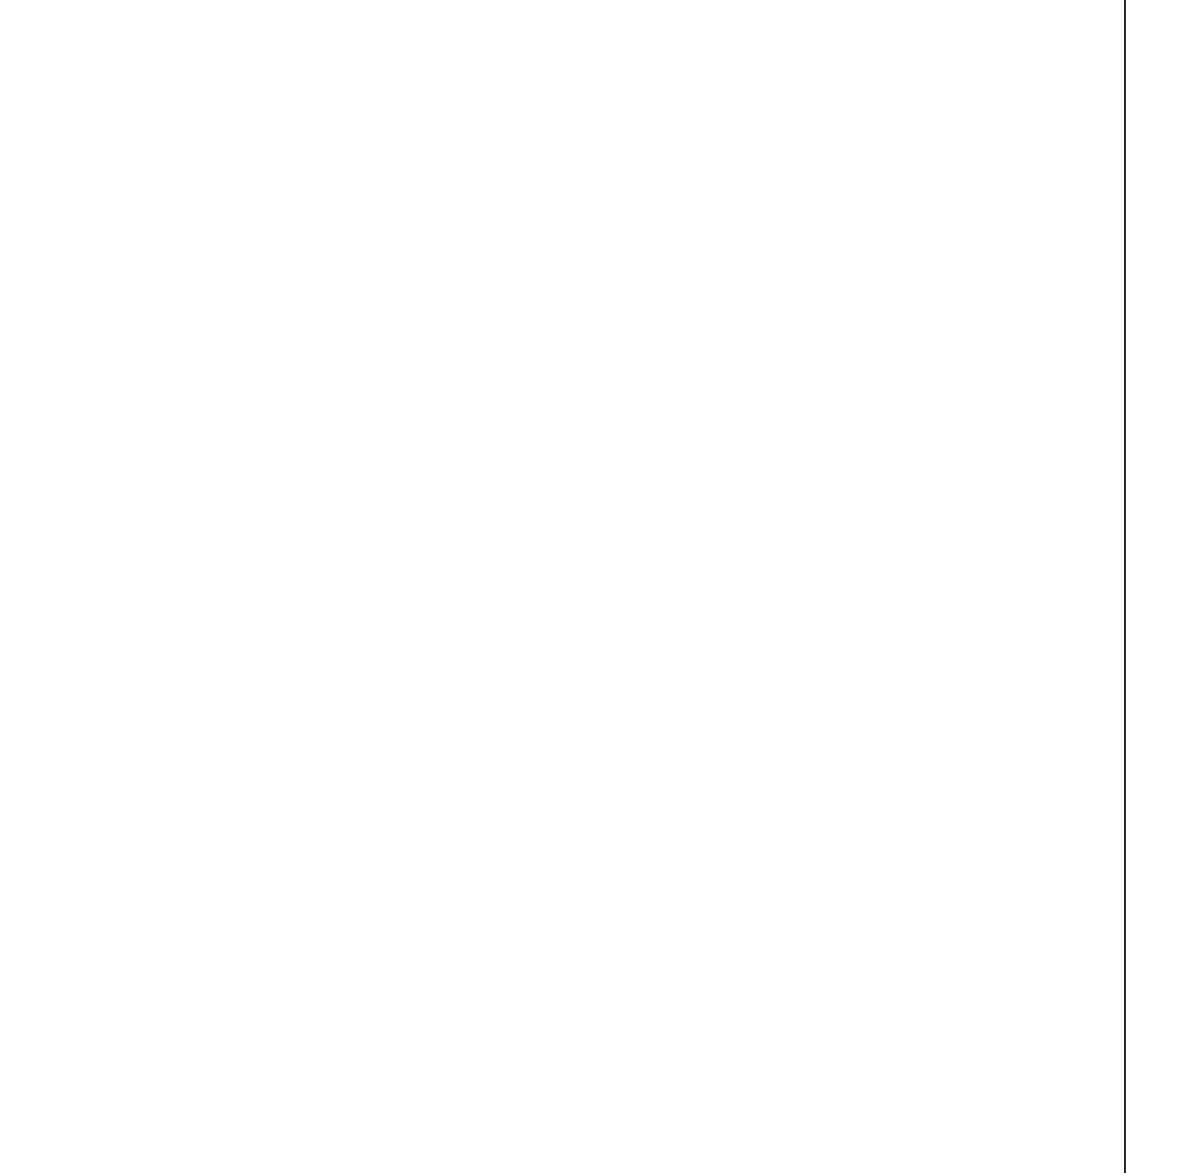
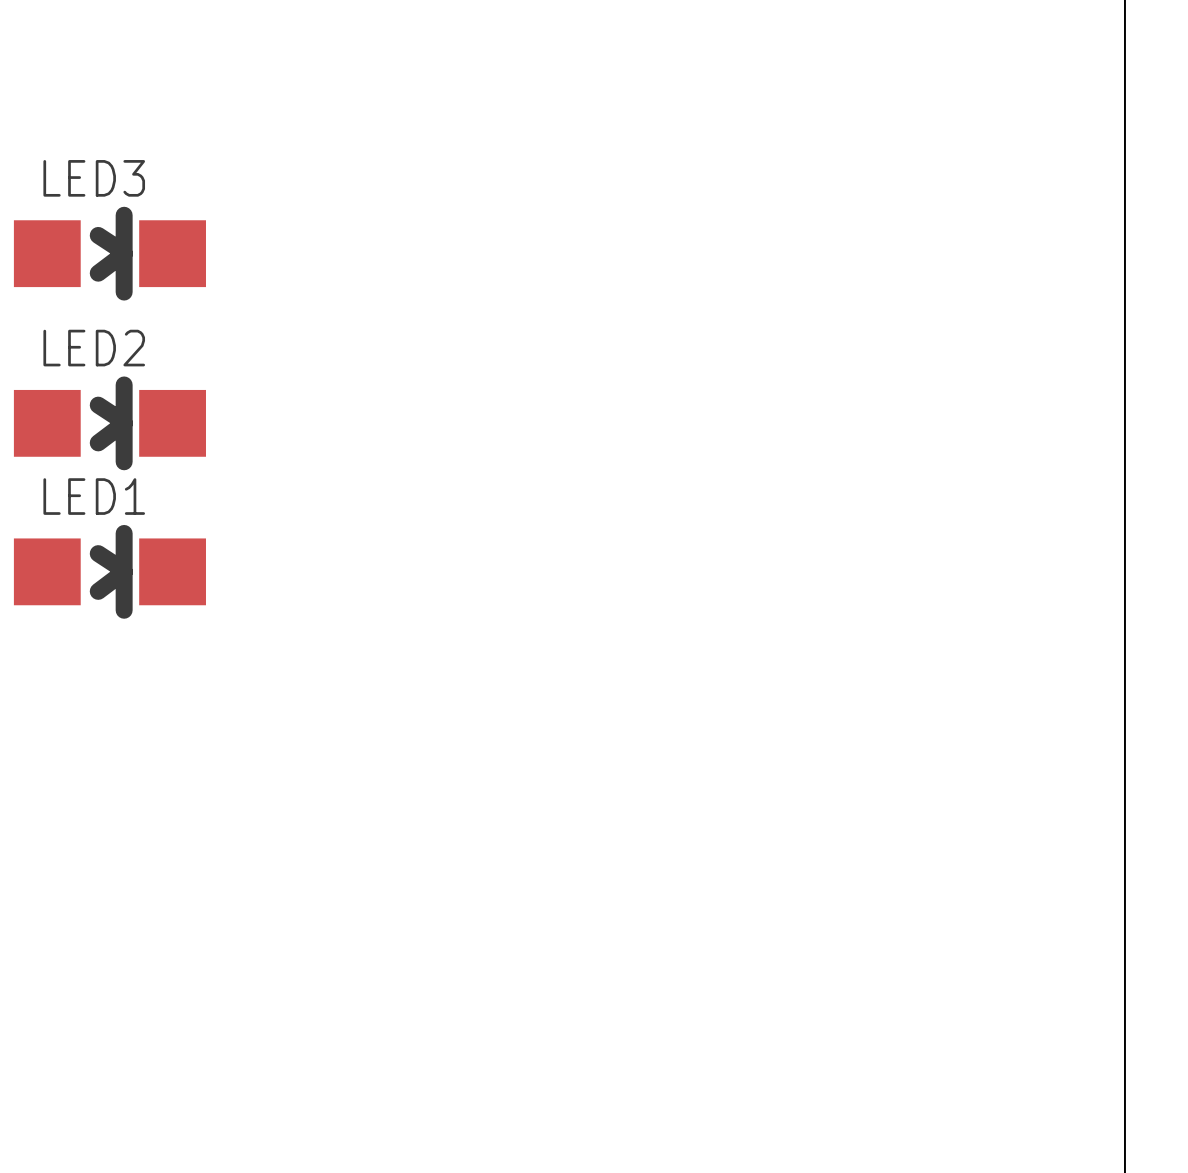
LED3: none -> (109, 253)
LED2: none -> (109, 423)
LED1: none -> (109, 571)

